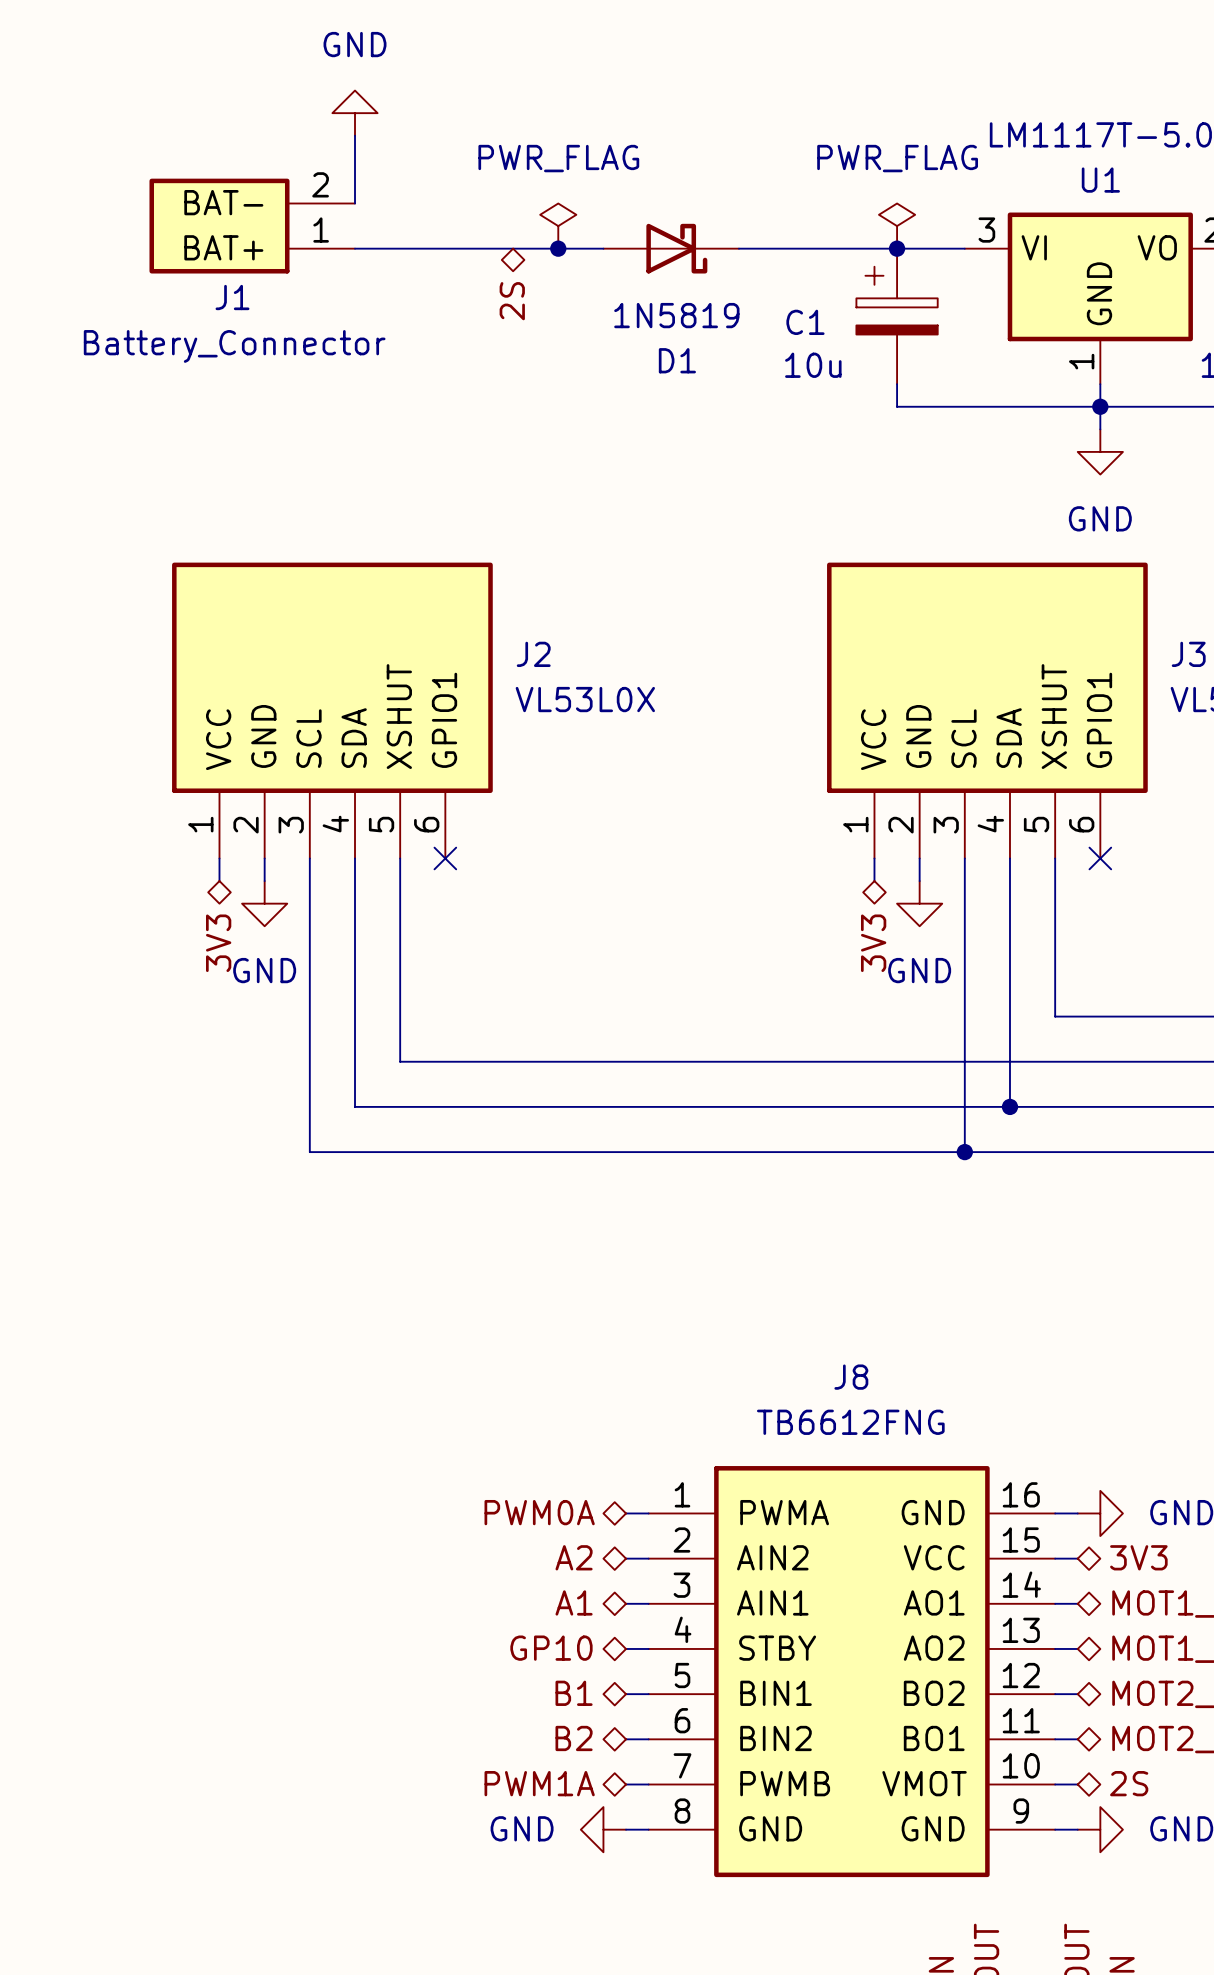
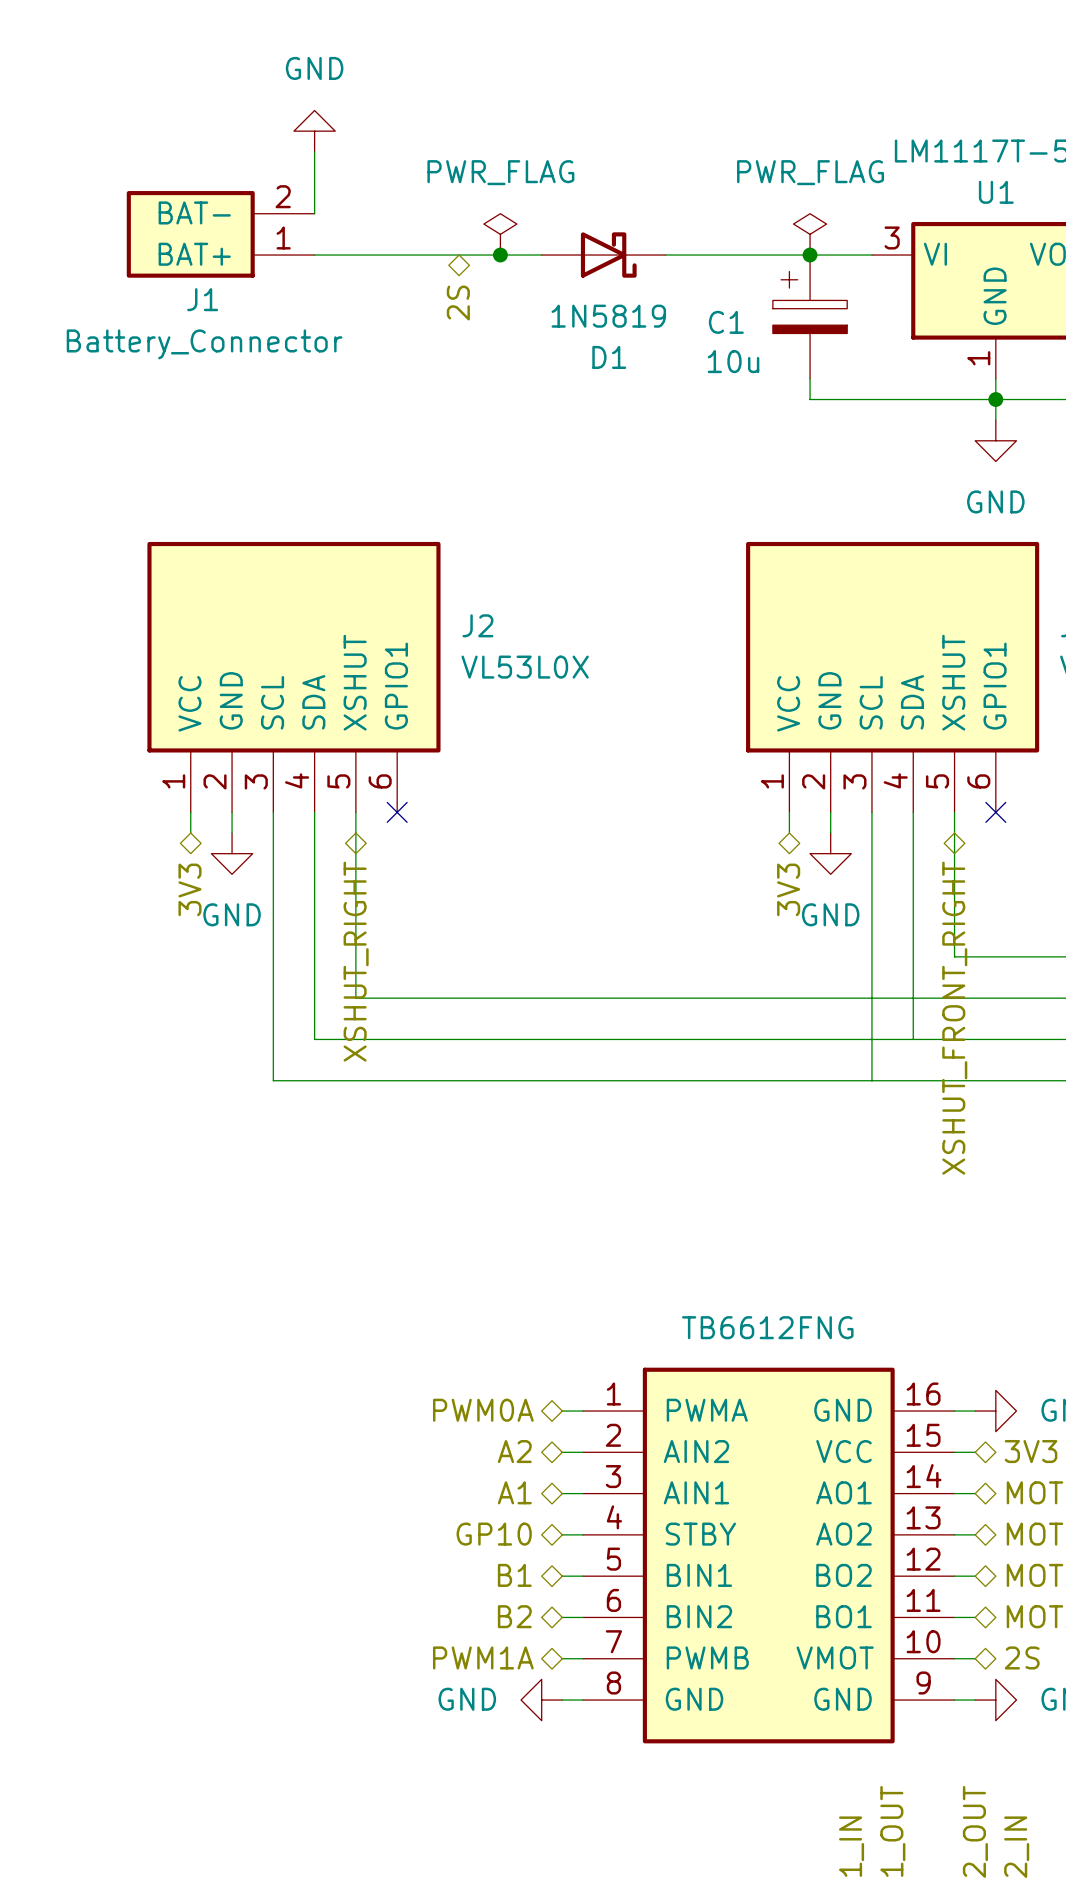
hierarchical label: none -> XSHUT_RIGHT (356, 961)
hierarchical label: none -> XSHUT_FRONT_RIGHT (954, 1018)
junction: (1009, 1106) -> none
junction: (964, 1152) -> none
J8 name: J8 (851, 1377) -> none

